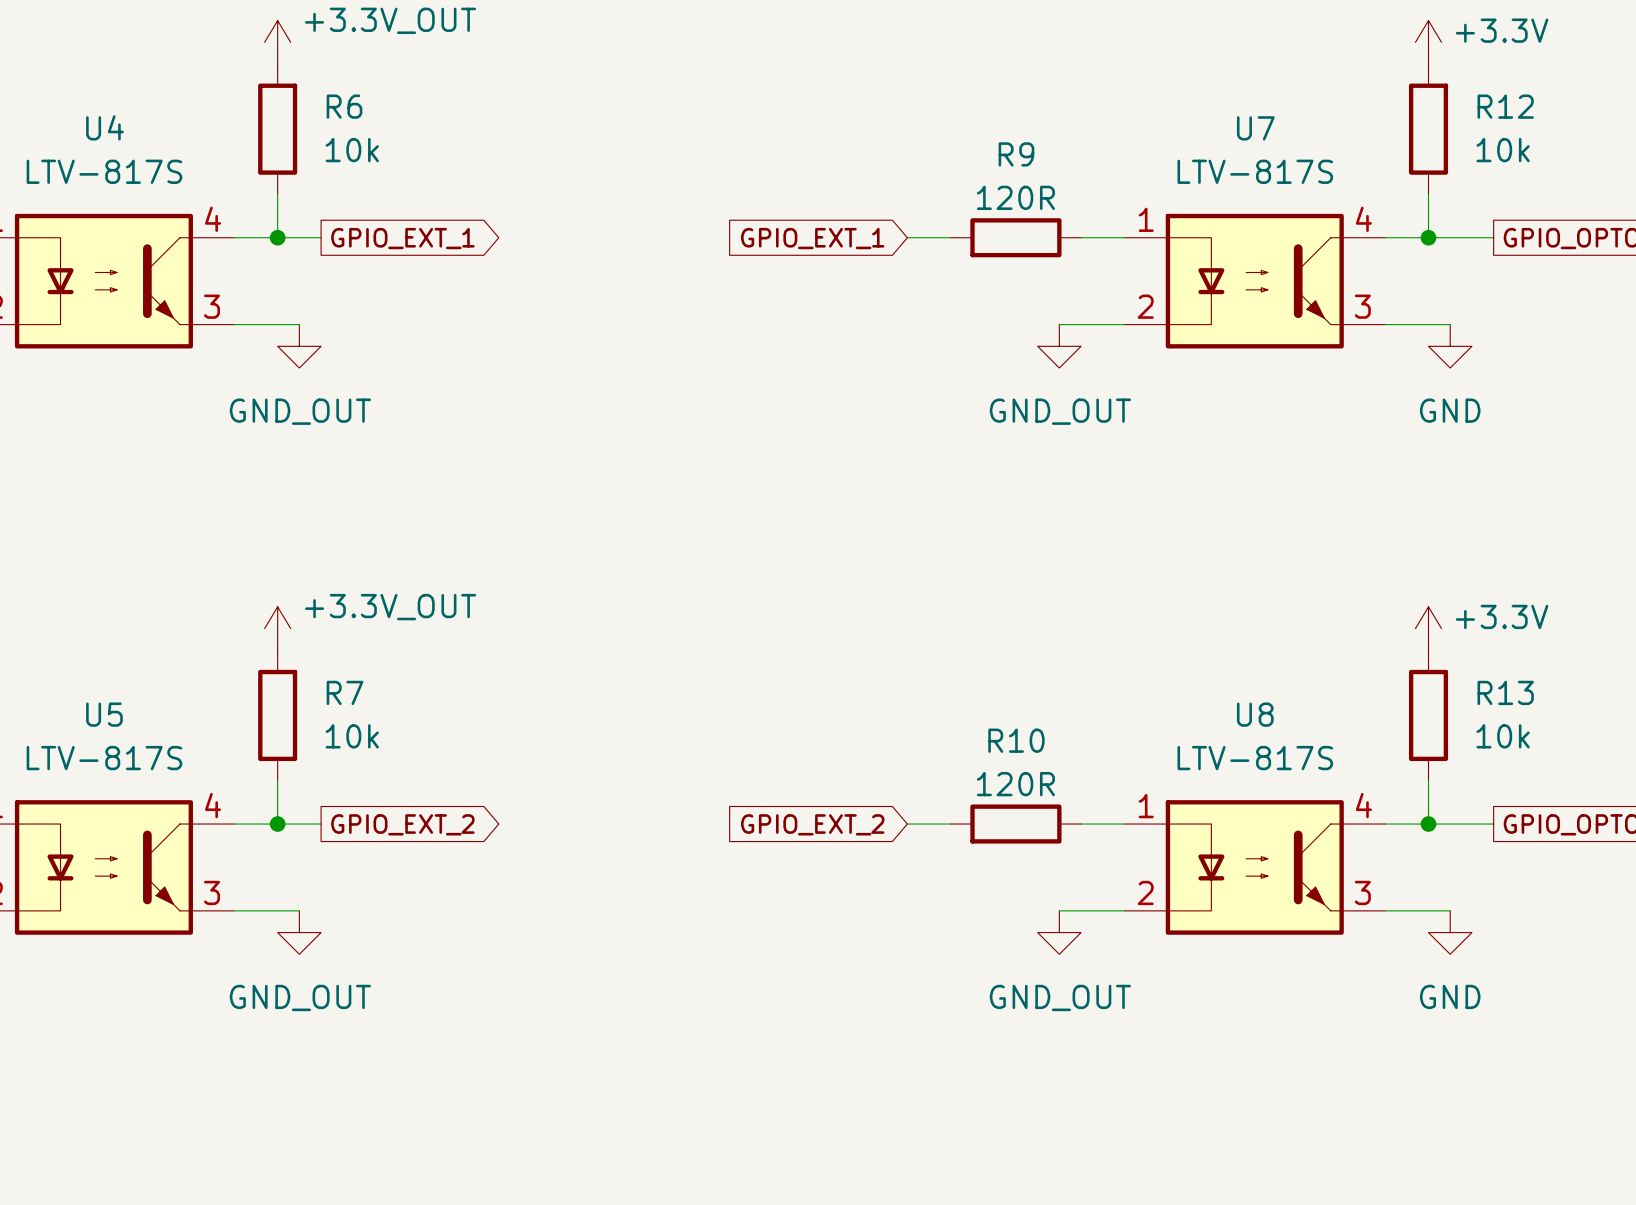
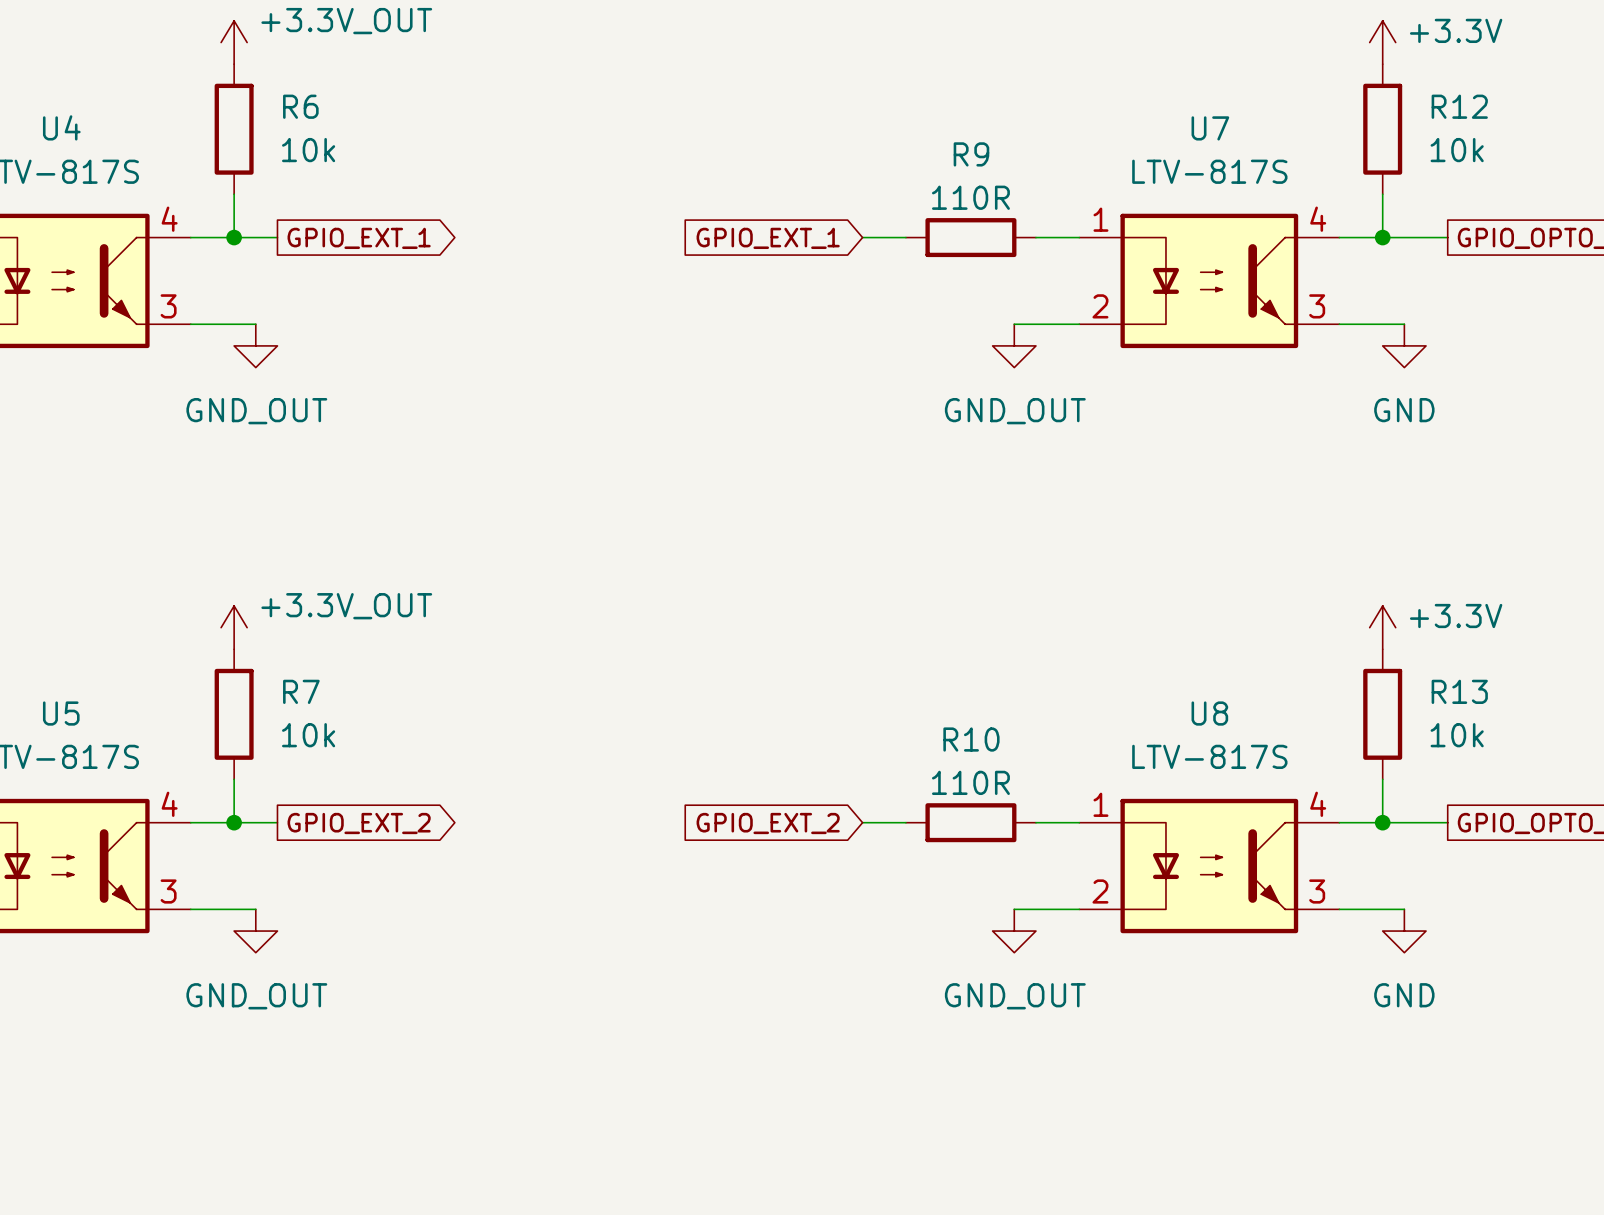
R9 value: 120R (1015, 197) -> 110R (970, 197)
R10 value: 120R (1015, 784) -> 110R (970, 782)

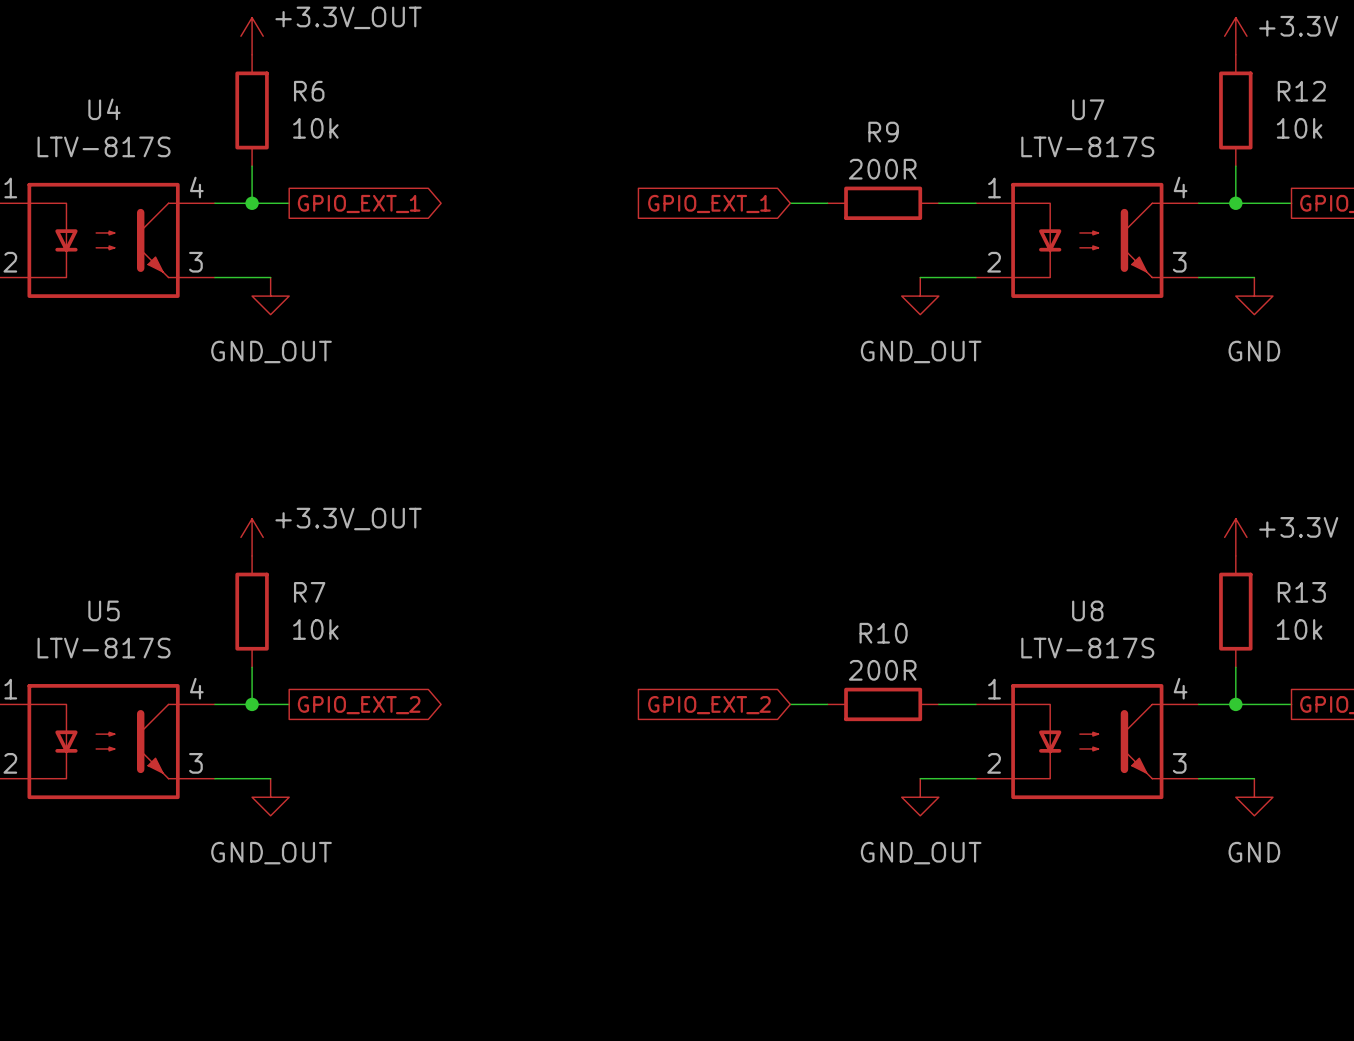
R9 value: 110R (970, 197) -> 200R (882, 169)
R10 value: 110R (970, 782) -> 200R (882, 670)

